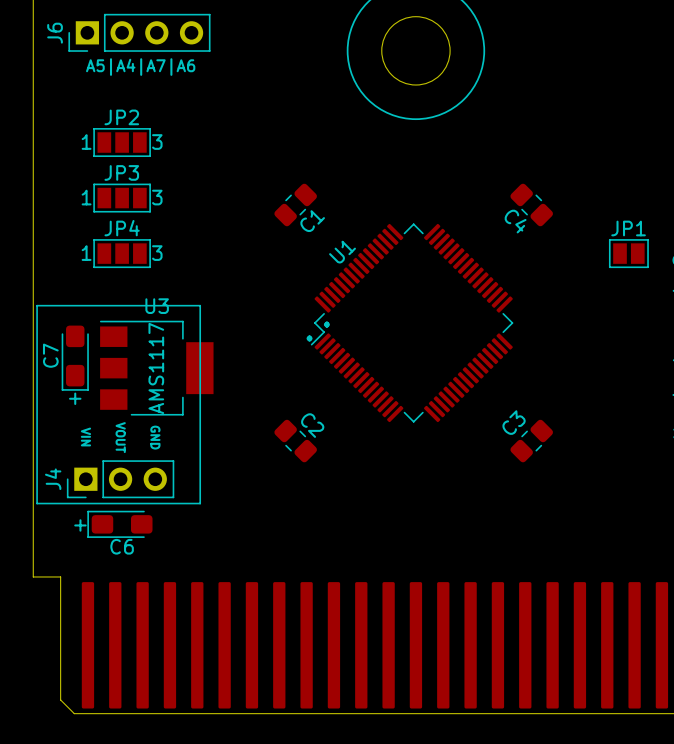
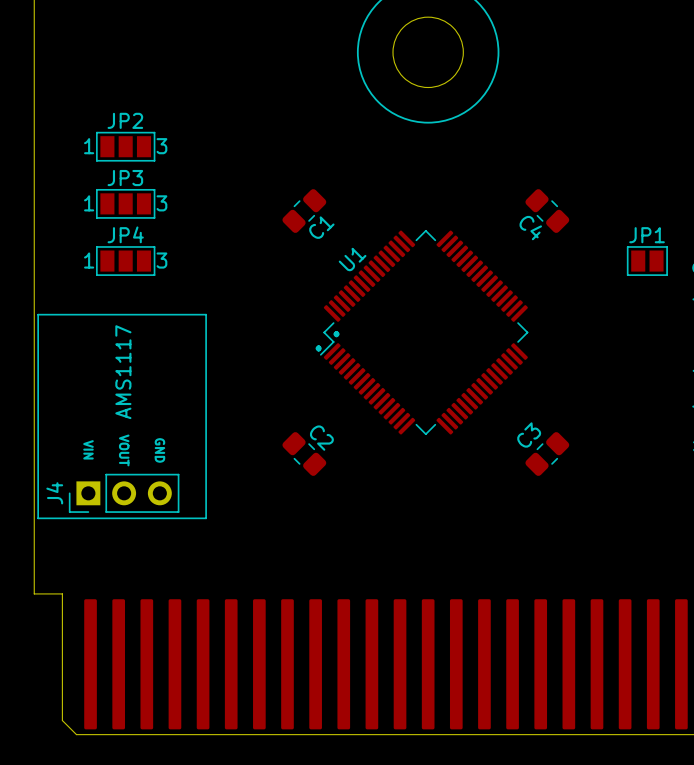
J6: (139, 32) -> none
text: A5|A4|A7|A6 (140, 67) -> none
C7: (75, 358) -> none
J4 value position: AMS1117 (156, 368) -> AMS1117 (123, 372)
U3: (156, 368) -> none
text: + (75, 398) -> none
C6: (119, 524) -> none
text: + (80, 525) -> none

